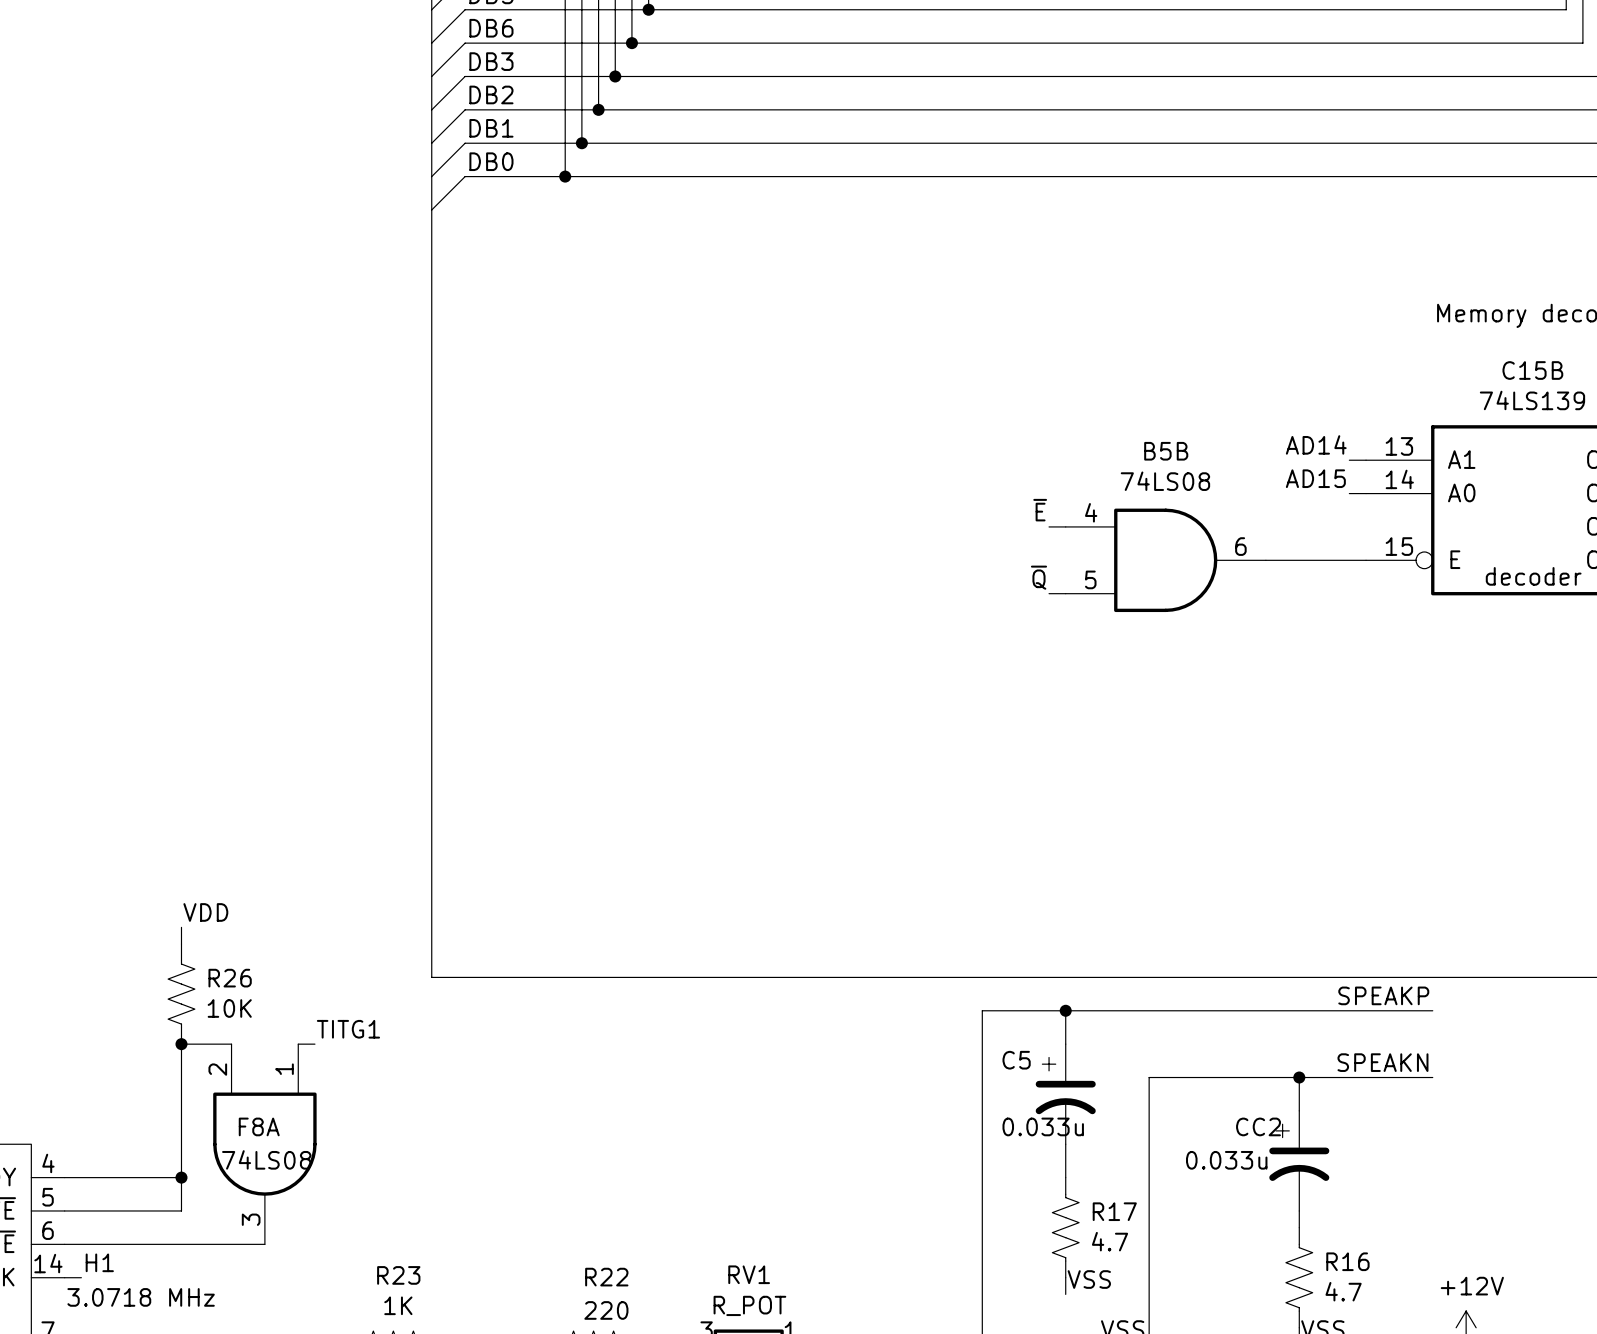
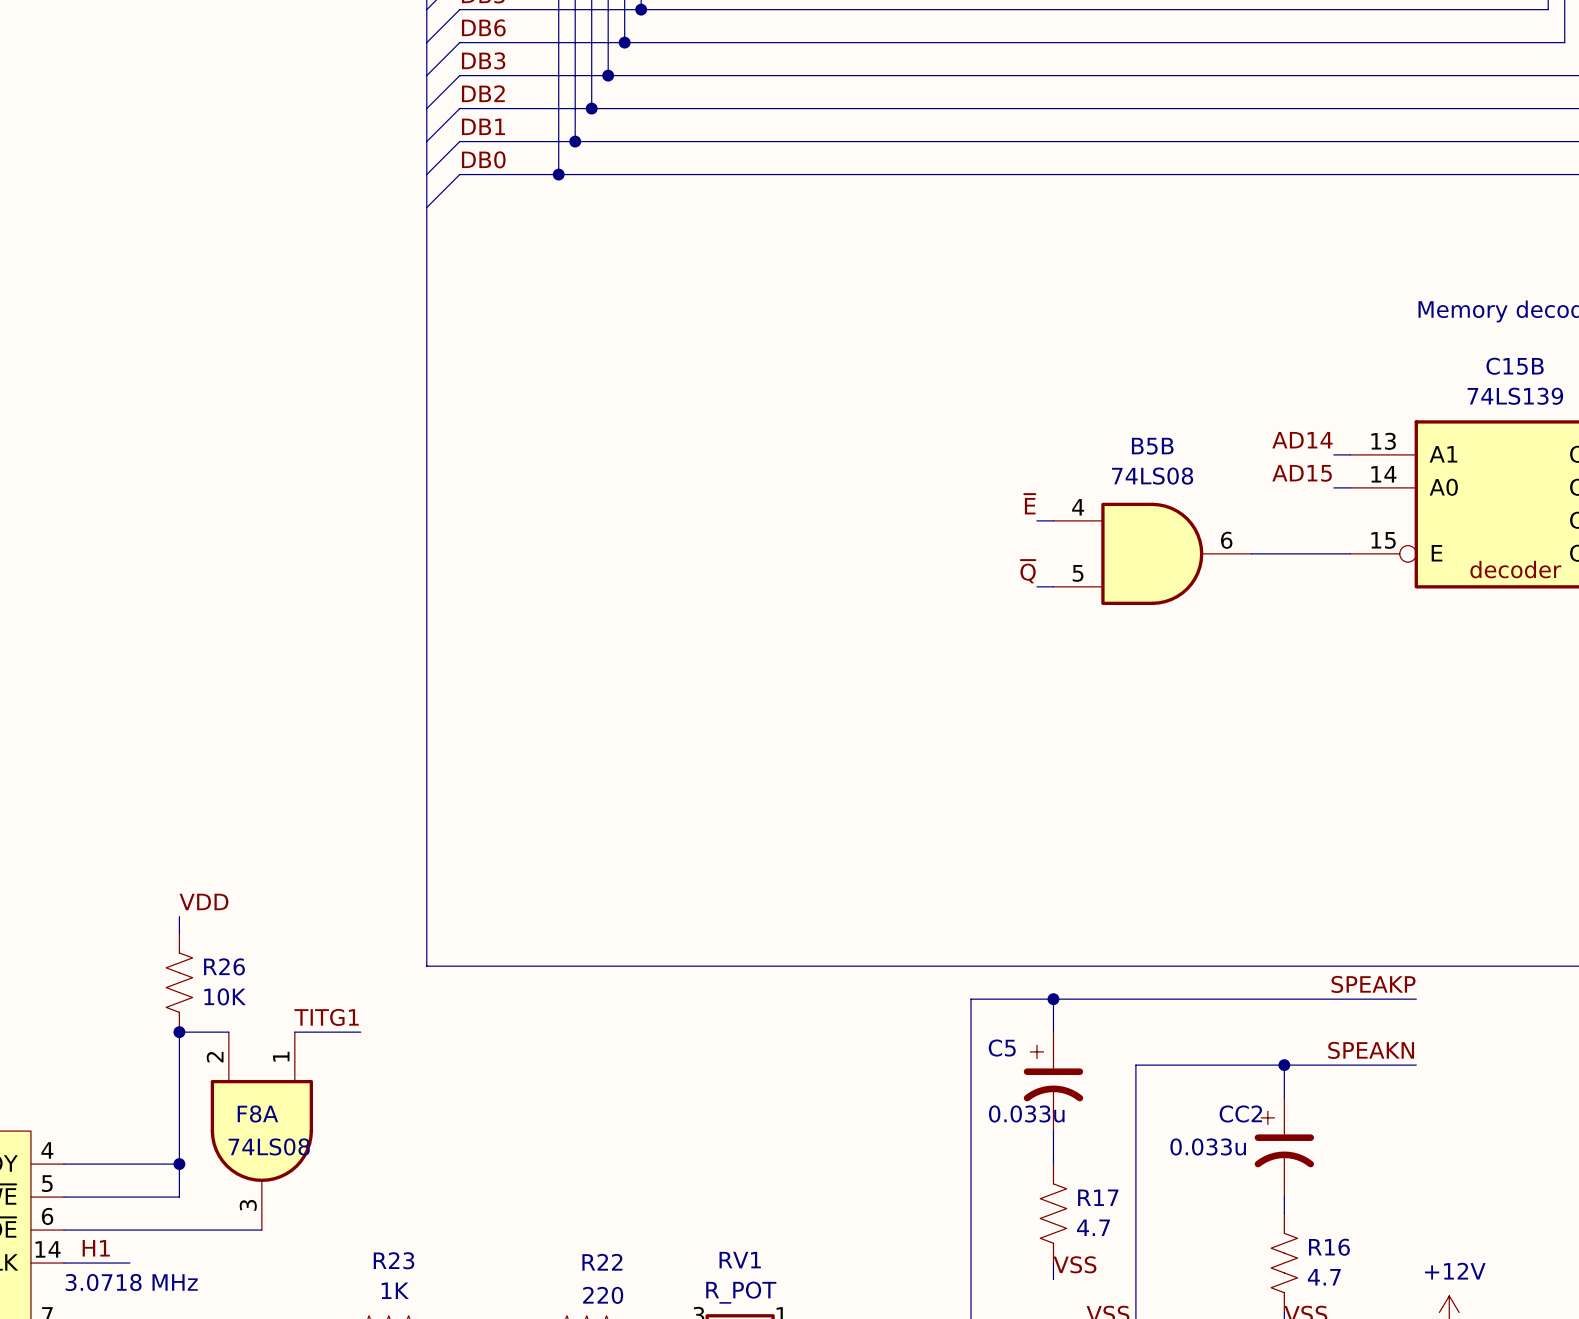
label position: TITG1 (348, 1029) -> TITG1 (326, 1017)
wire: none -> (311, 1032) (360, 1032)
wire: none -> (80, 1263) (129, 1263)

